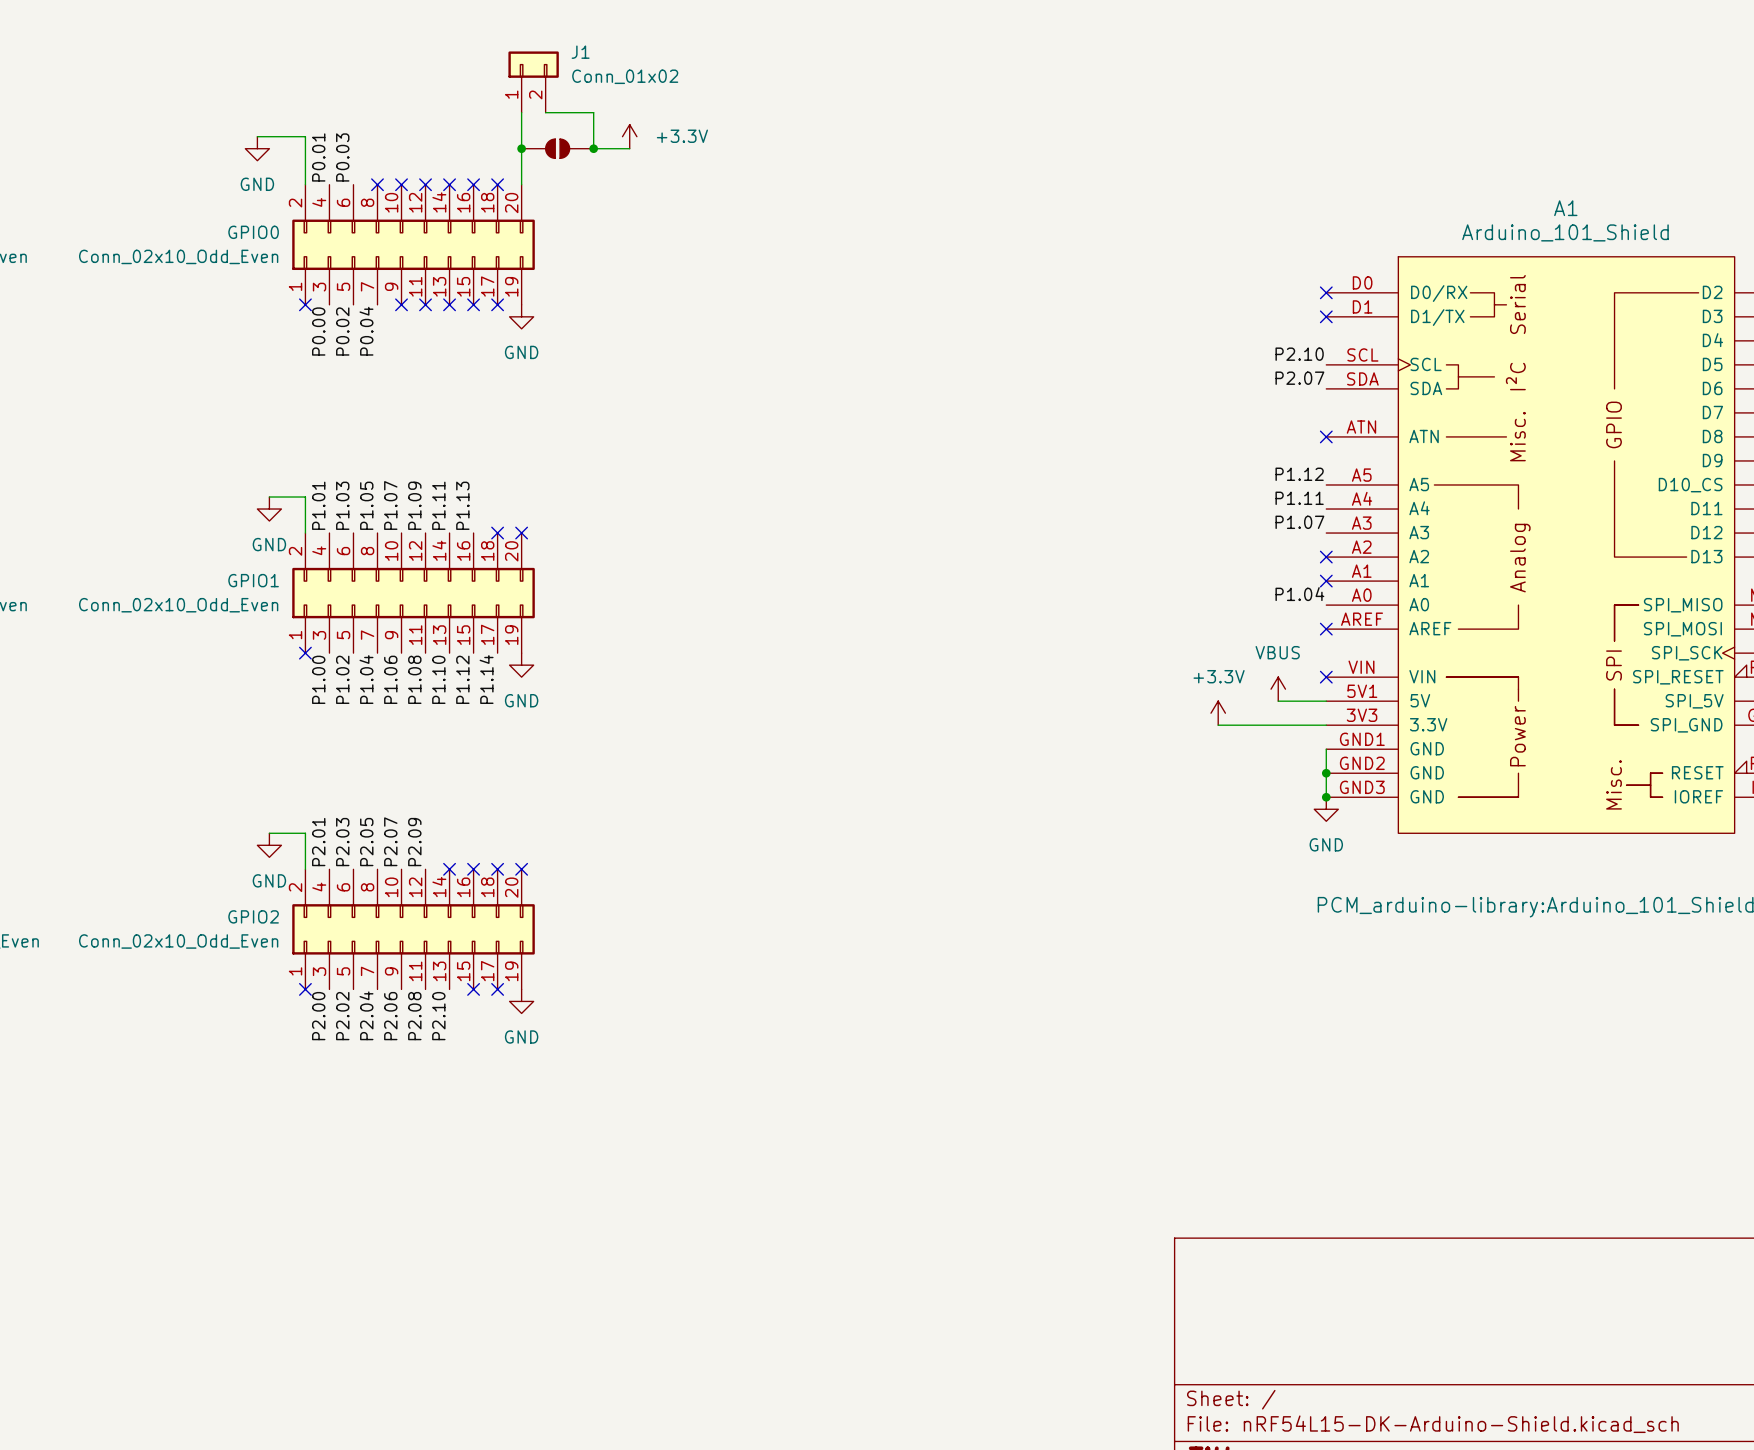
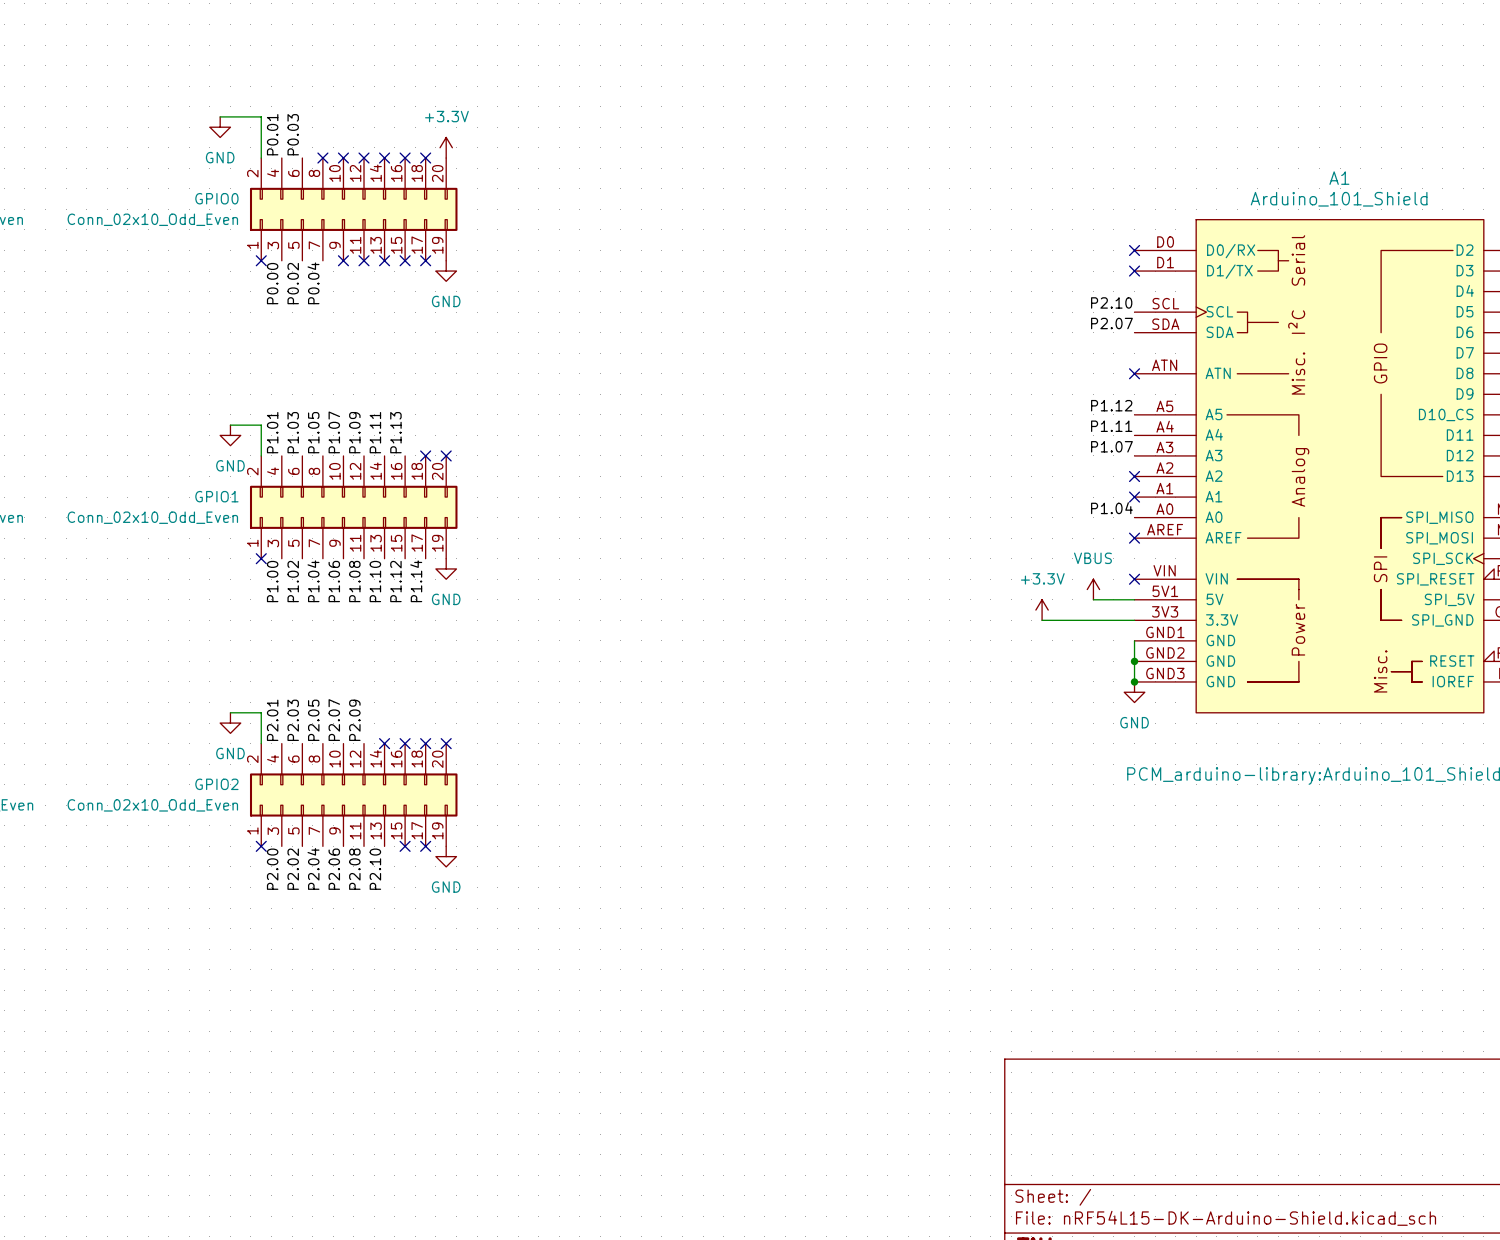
J1: Conn_01x02 (533, 82) -> none
wire: (521, 112) (521, 184) -> none
wire: (545, 112) (593, 112) (593, 148) (629, 148) -> none
power symbol position: +3.3V (629, 136) -> +3.3V (446, 147)
power symbol text position: +3.3V (682, 136) -> +3.3V (446, 116)
junction: (521, 148) -> none
part: (557, 148) -> none
junction: (593, 148) -> none

